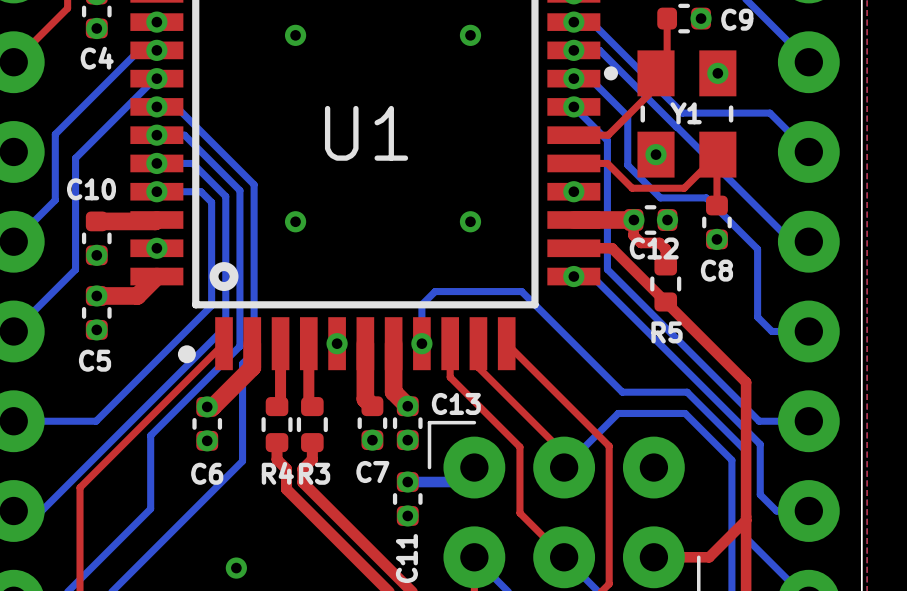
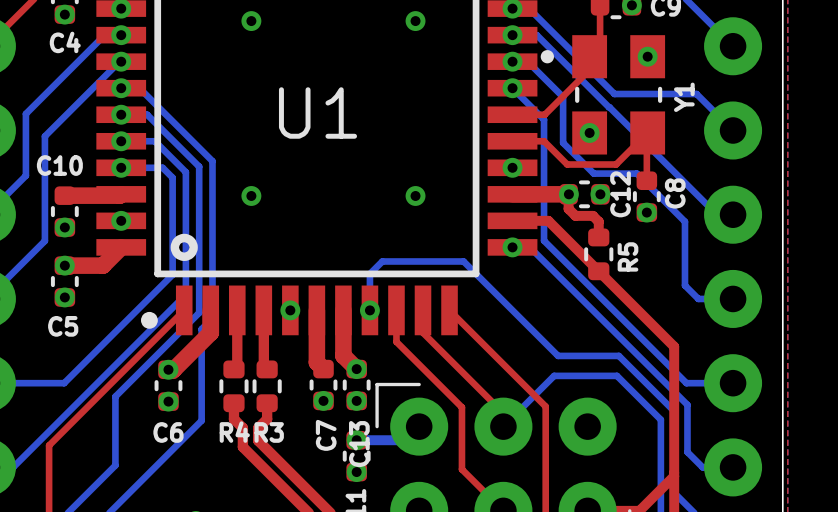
Y1 name rotation: 0° (686, 113) -> 90° counterclockwise (684, 97)
Y1 name position: Y1 (686, 113) -> Y1 (684, 97)
C12 name rotation: 0° (654, 248) -> 90° counterclockwise (620, 194)
C8 name rotation: 0° (716, 270) -> 90° counterclockwise (675, 193)
C8 name position: C8 (716, 270) -> C8 (675, 193)
R5 name rotation: 0° (667, 332) -> 90° counterclockwise (627, 256)
R5 name position: R5 (667, 332) -> R5 (627, 256)
C13 name rotation: 0° (456, 403) -> 90° counterclockwise (359, 444)
C13 name position: C13 (456, 403) -> C13 (359, 444)
C7 name rotation: 0° (372, 472) -> 90° counterclockwise (326, 435)

